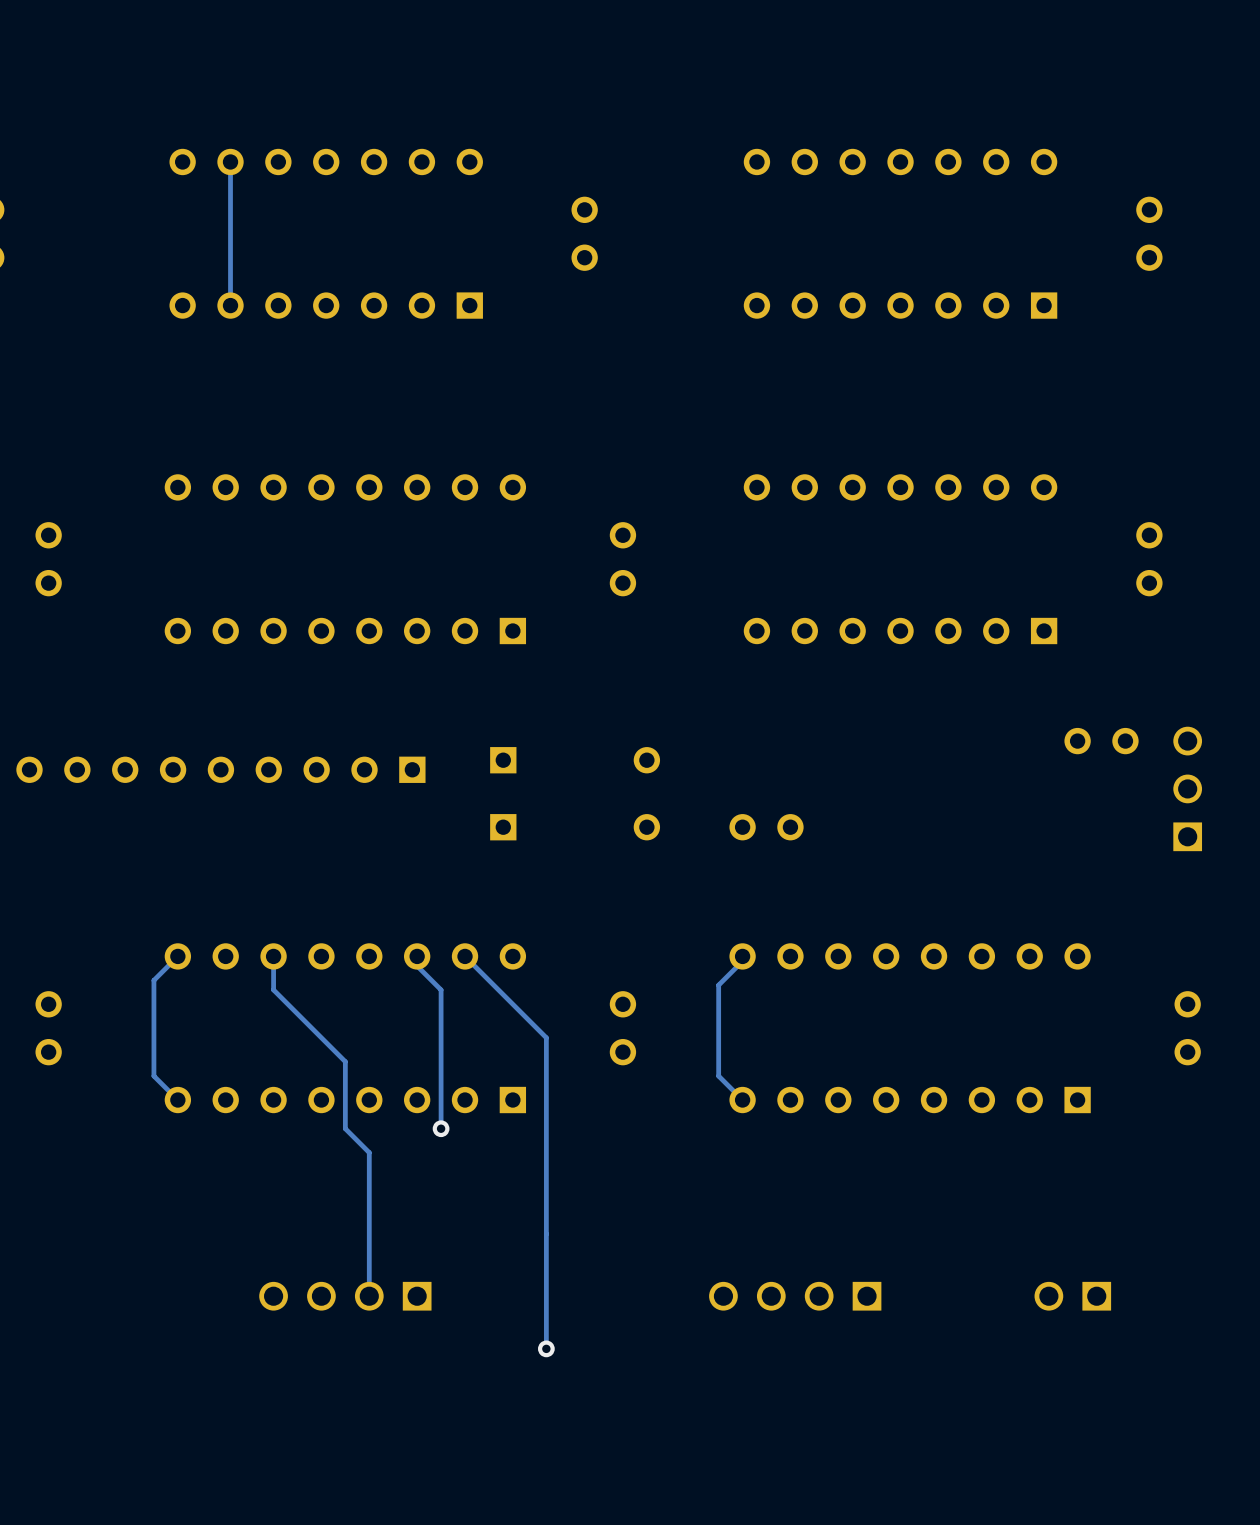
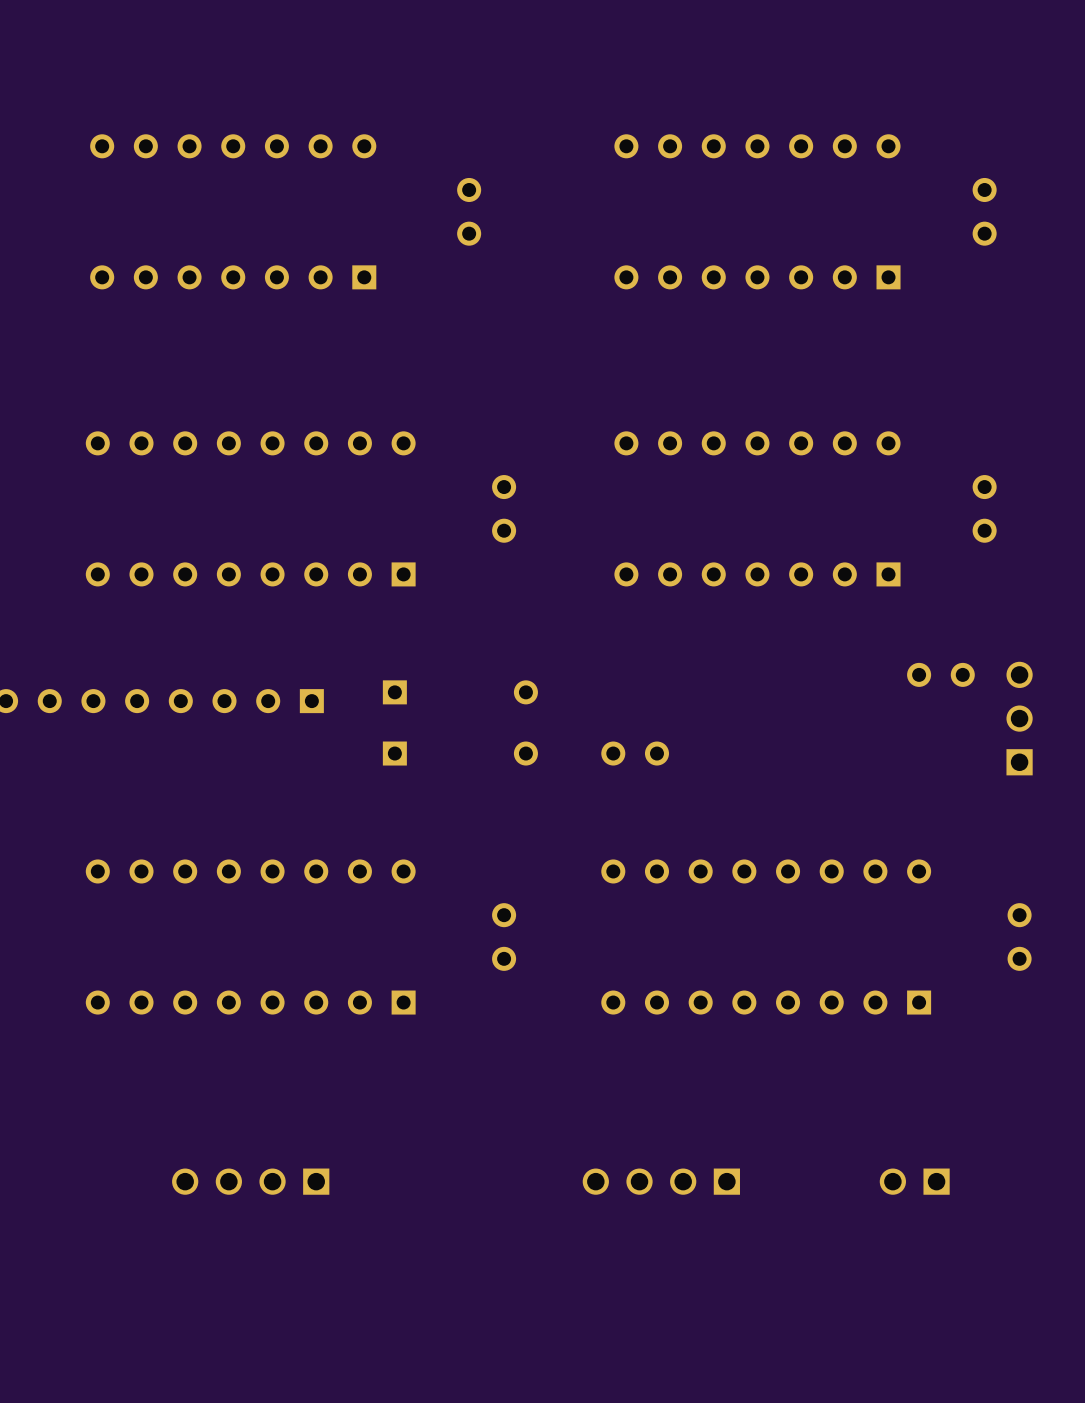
track: (230, 161) (230, 305) -> none
track: (177, 956) (153, 980) (153, 1076) (177, 1100) -> none
track: (273, 956) (273, 989) (345, 1061) (345, 1128) (369, 1152) (369, 1296) -> none
track: (417, 956) (417, 966) (441, 989) (441, 1128) -> none
track: (465, 956) (546, 1037) (546, 1348) -> none
track: (742, 956) (742, 961) (718, 985) (718, 1076) (742, 1100) -> none
via: (441, 1128) -> none
via: (546, 1348) -> none

